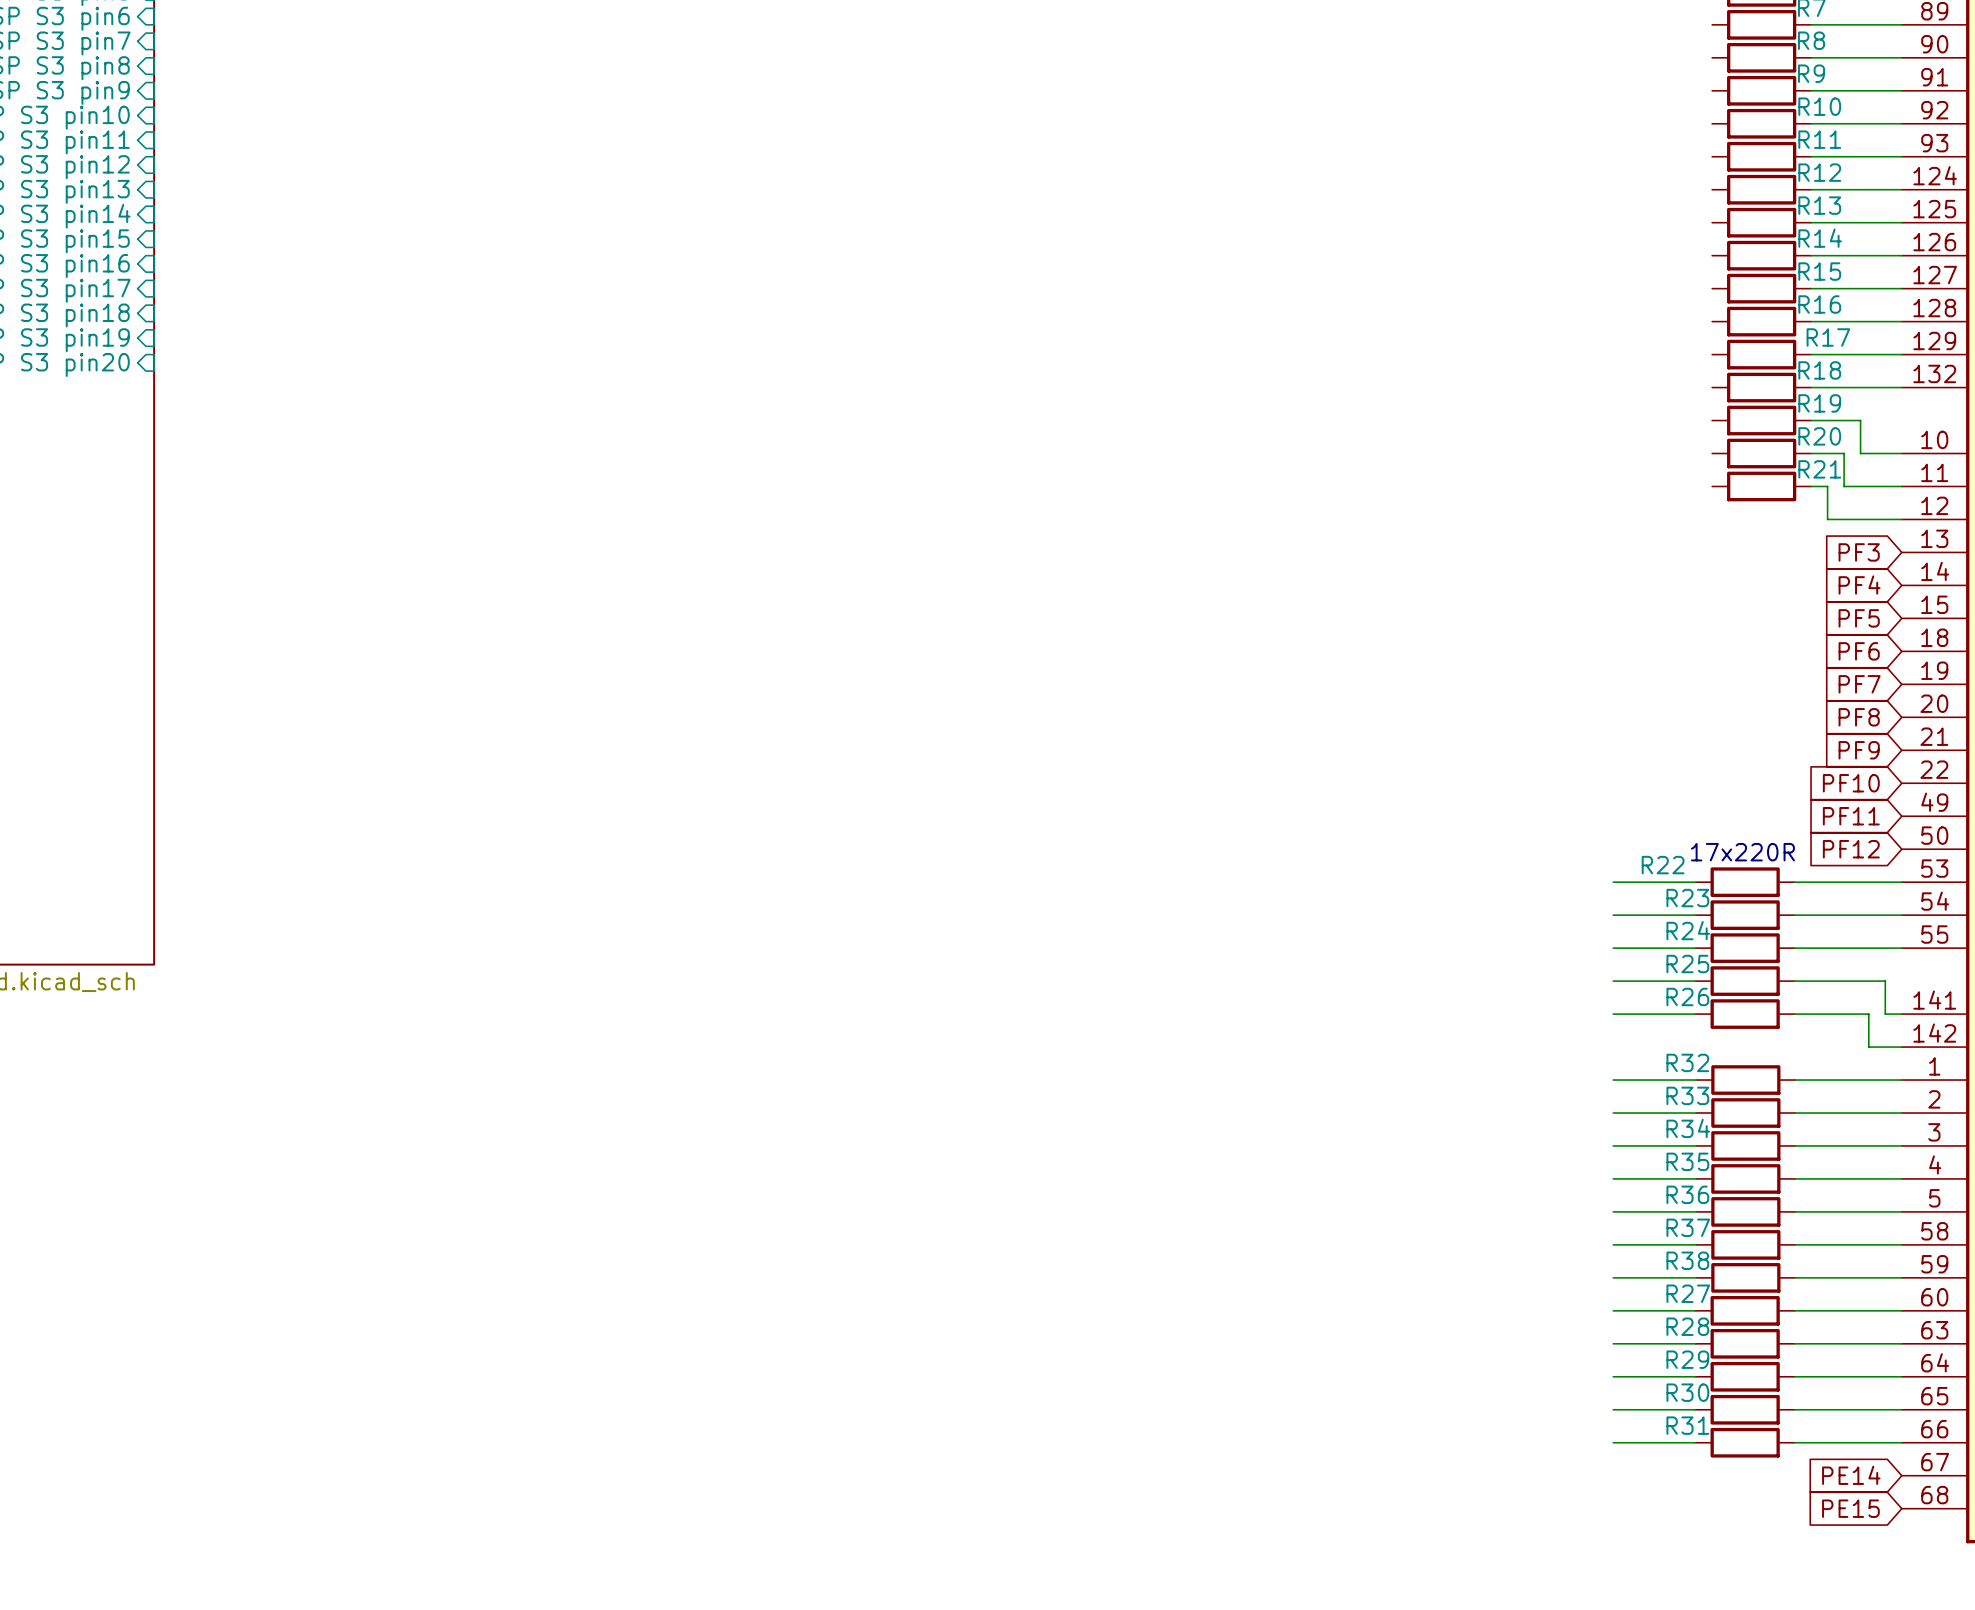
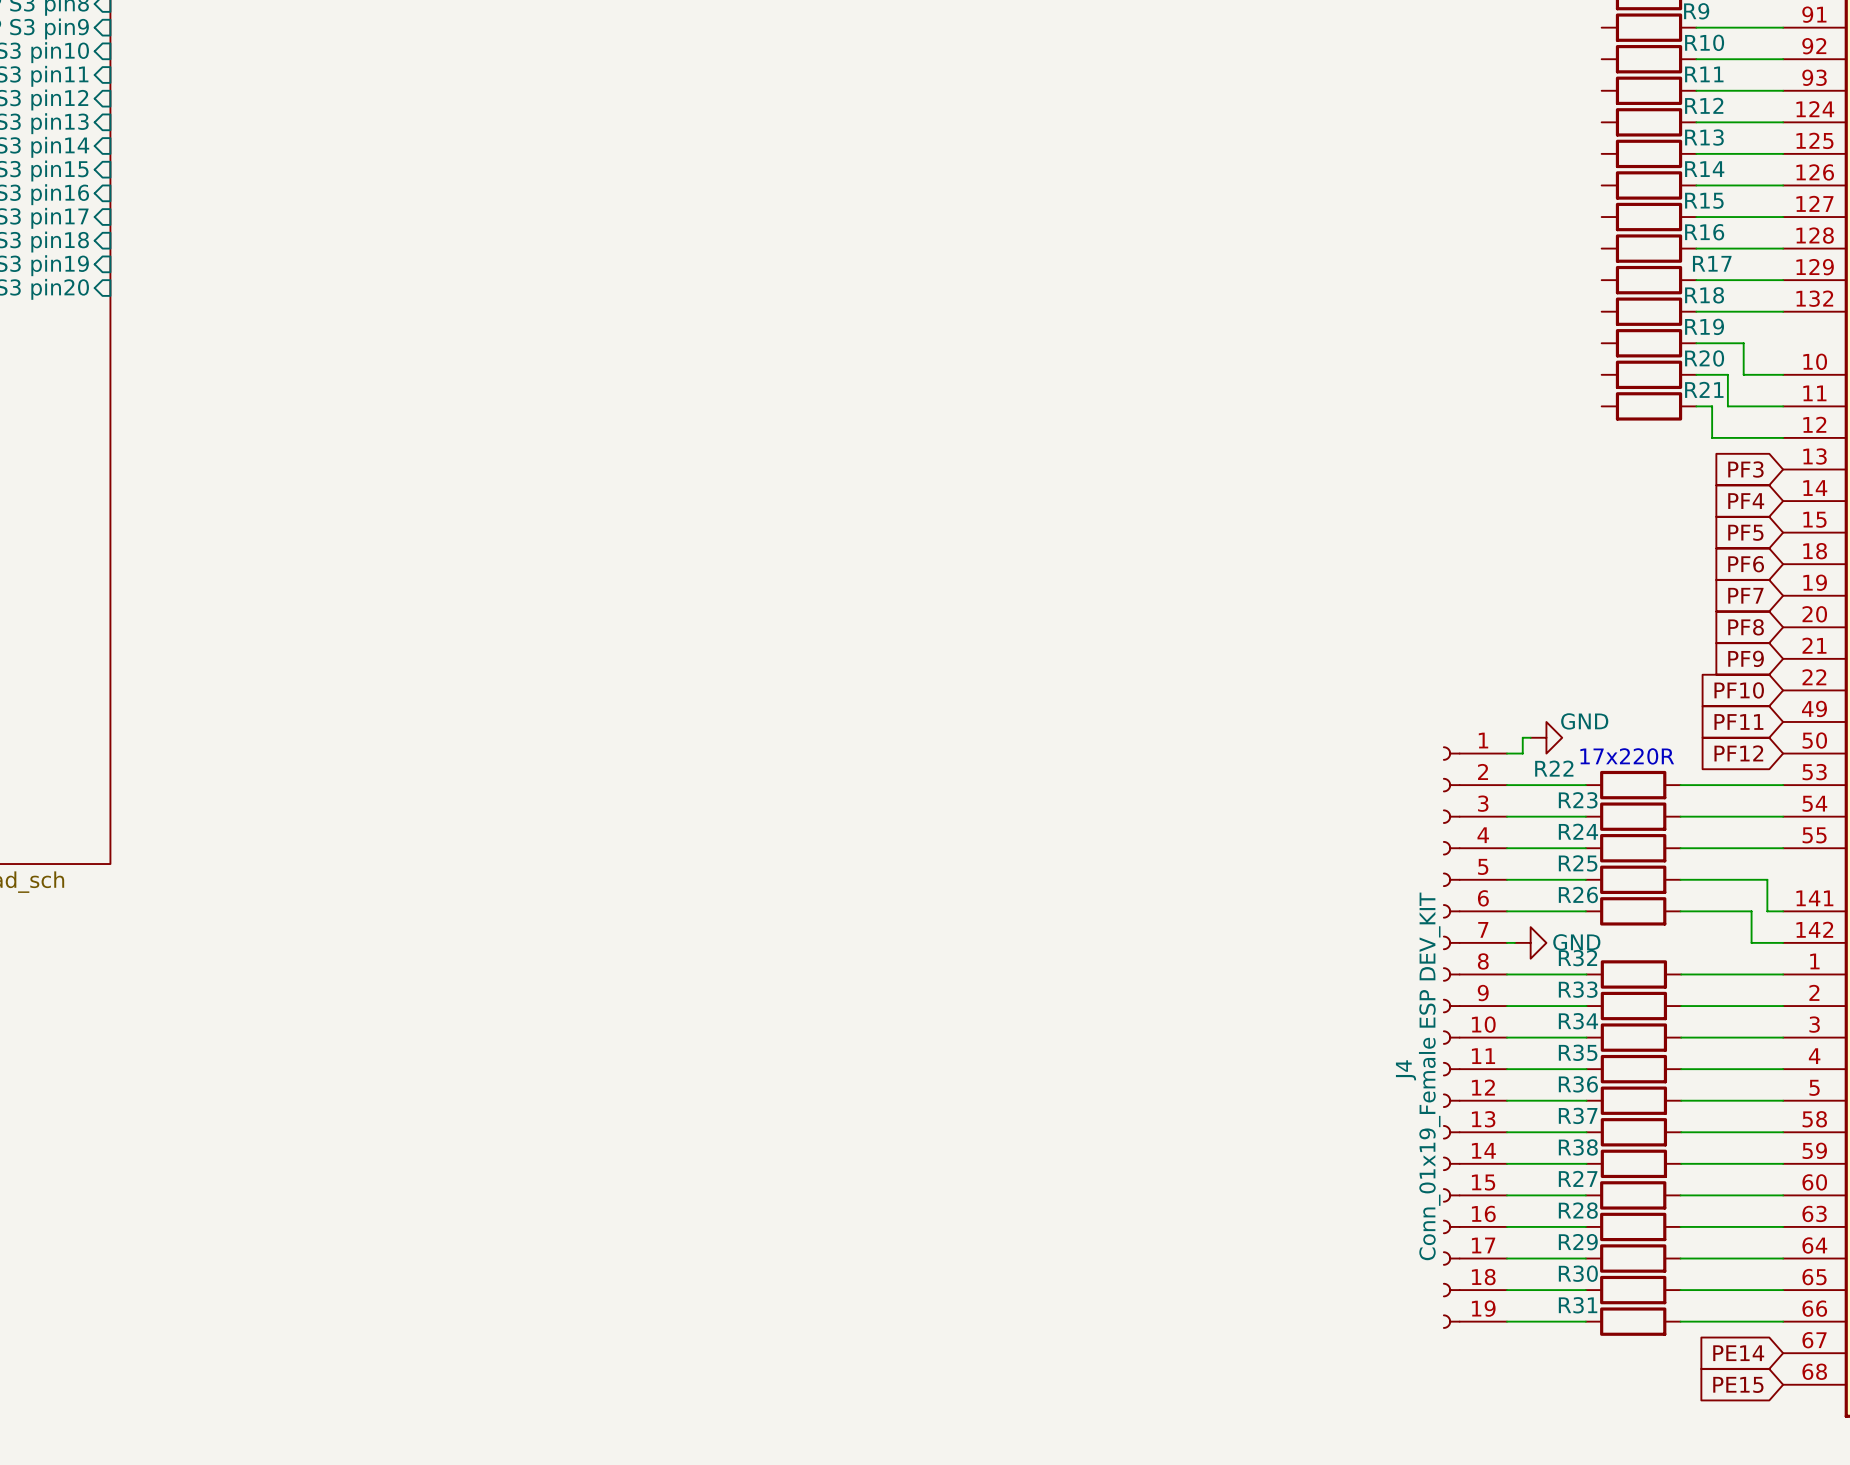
wire: none -> (1530, 737) (1522, 737) (1522, 753) (1506, 753)
power symbol: none -> GND (1546, 737)
wire: none -> (1506, 942) (1514, 942)
power symbol: none -> GND (1530, 942)
J4: none -> Conn_01x19_Female ESP DEV_KIT (1474, 1037)

